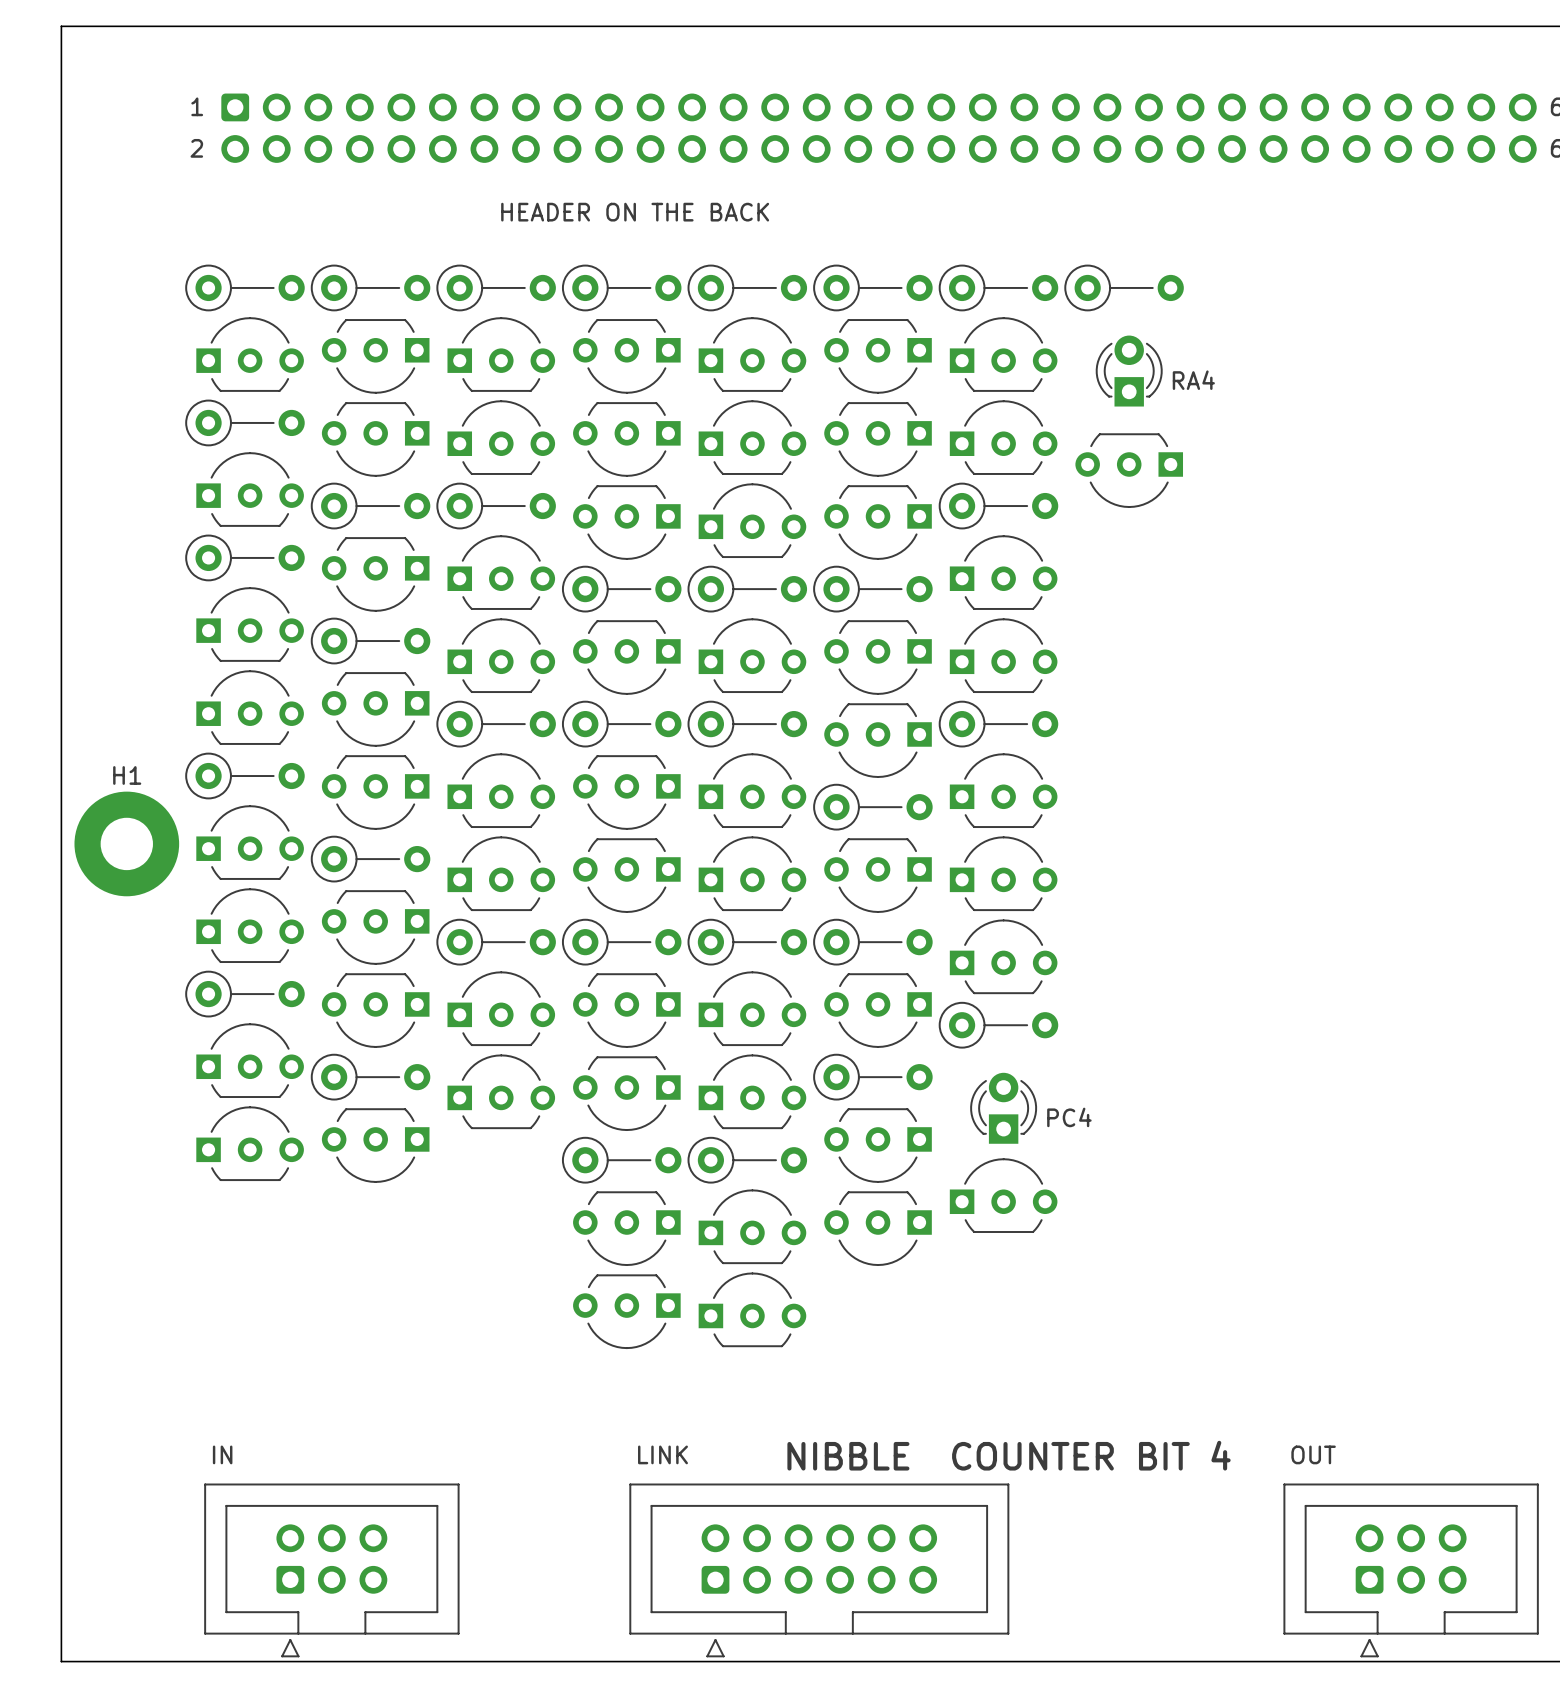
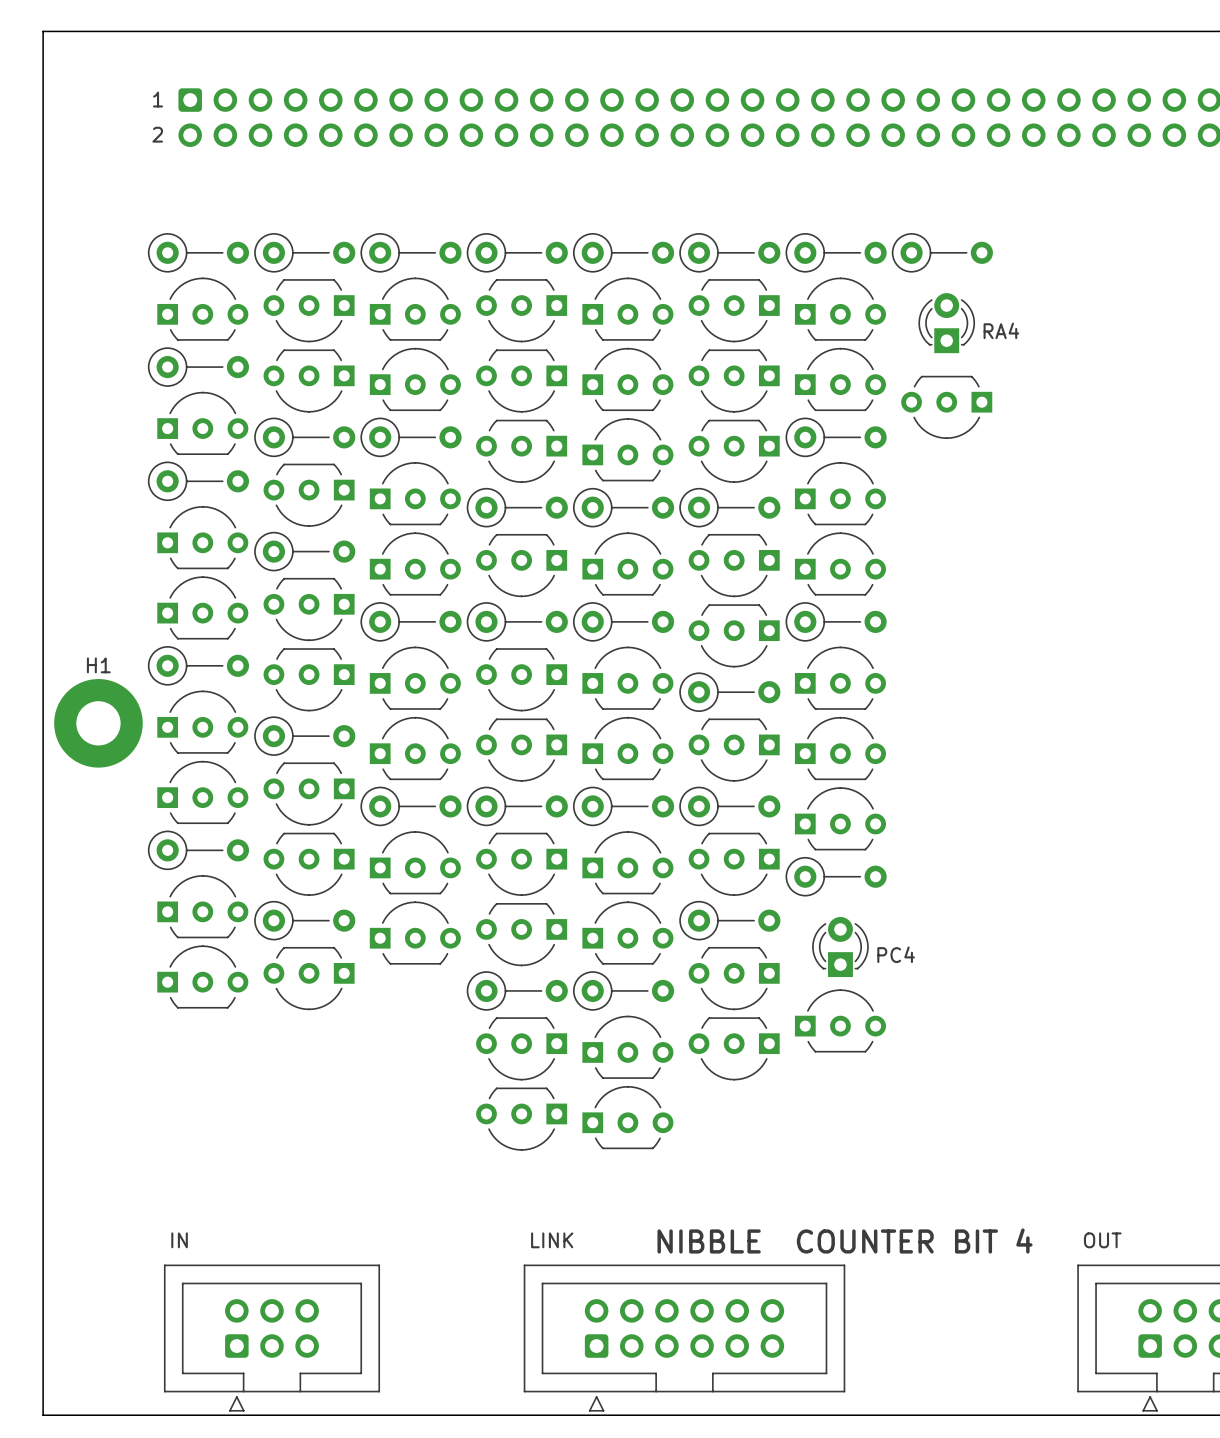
text: HEADER ON THE BACK (635, 212) -> none

